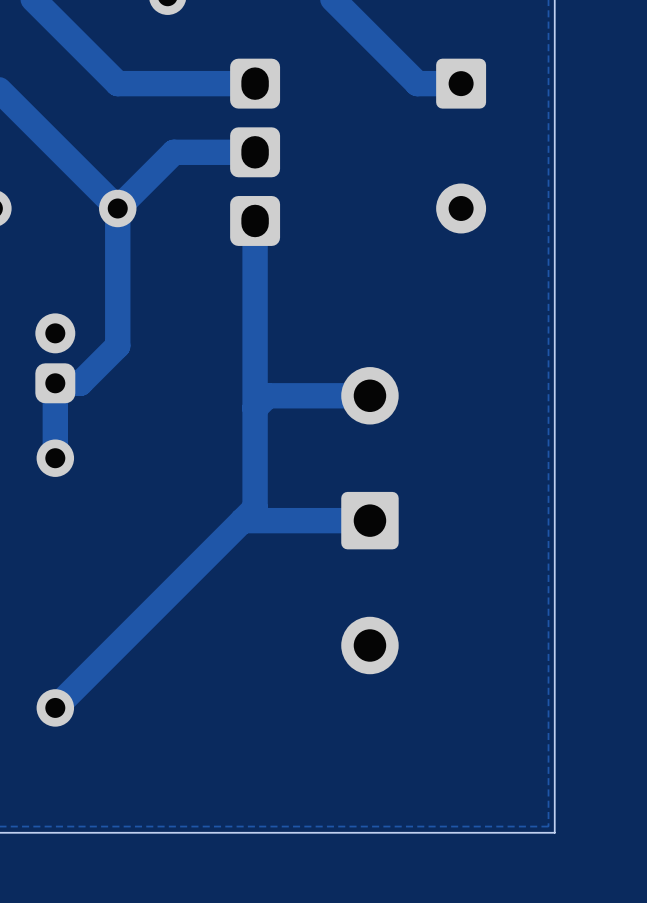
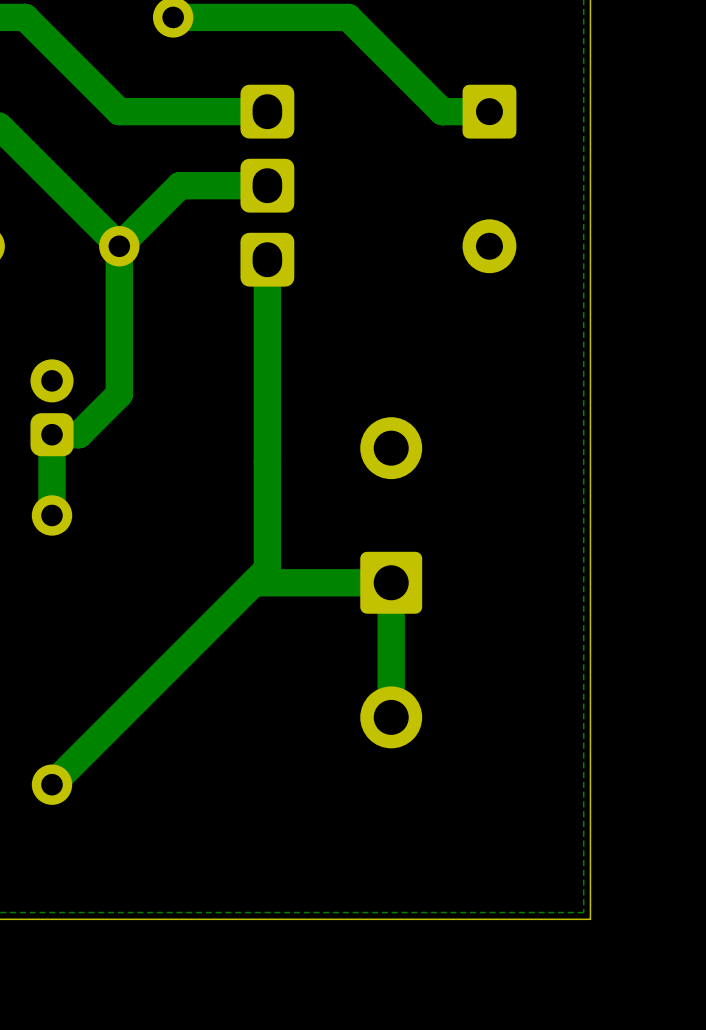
track: (369, 395) (267, 395) (255, 408) -> none
track: none -> (391, 582) (391, 717)

